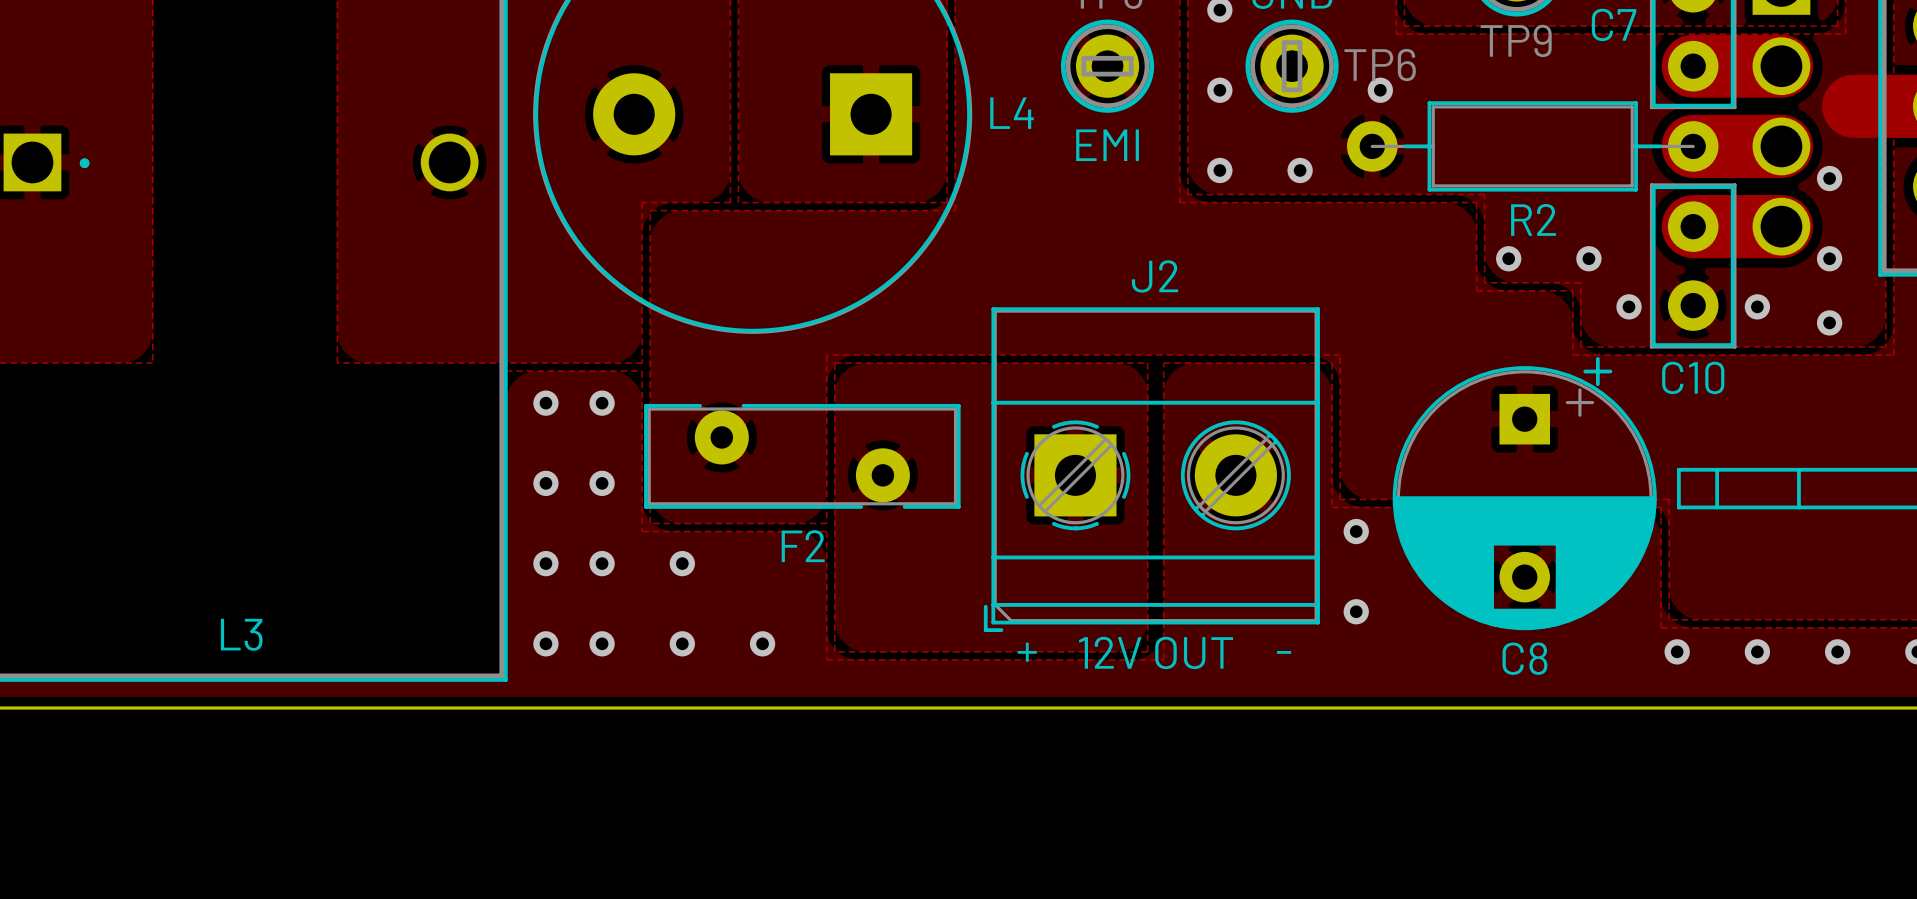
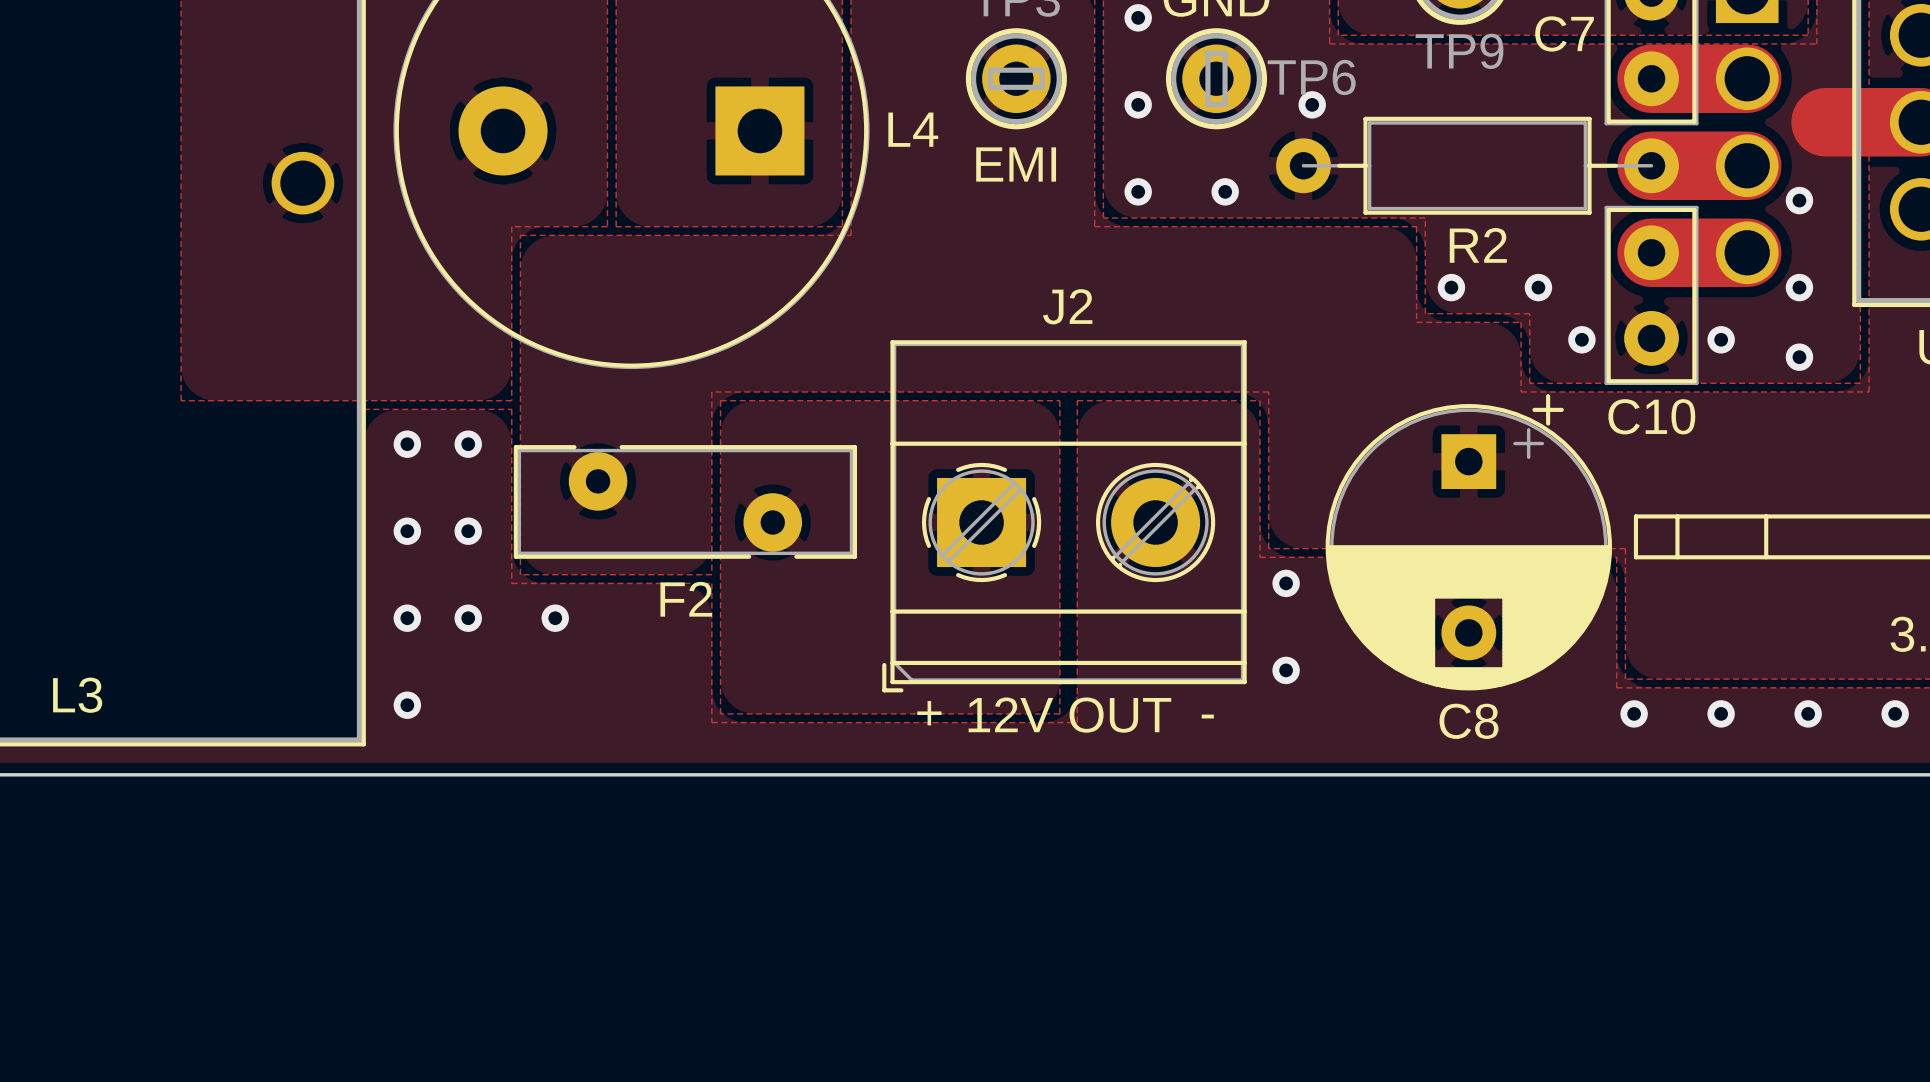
via: (602, 643) -> none
via: (682, 643) -> none
via: (762, 643) -> none

